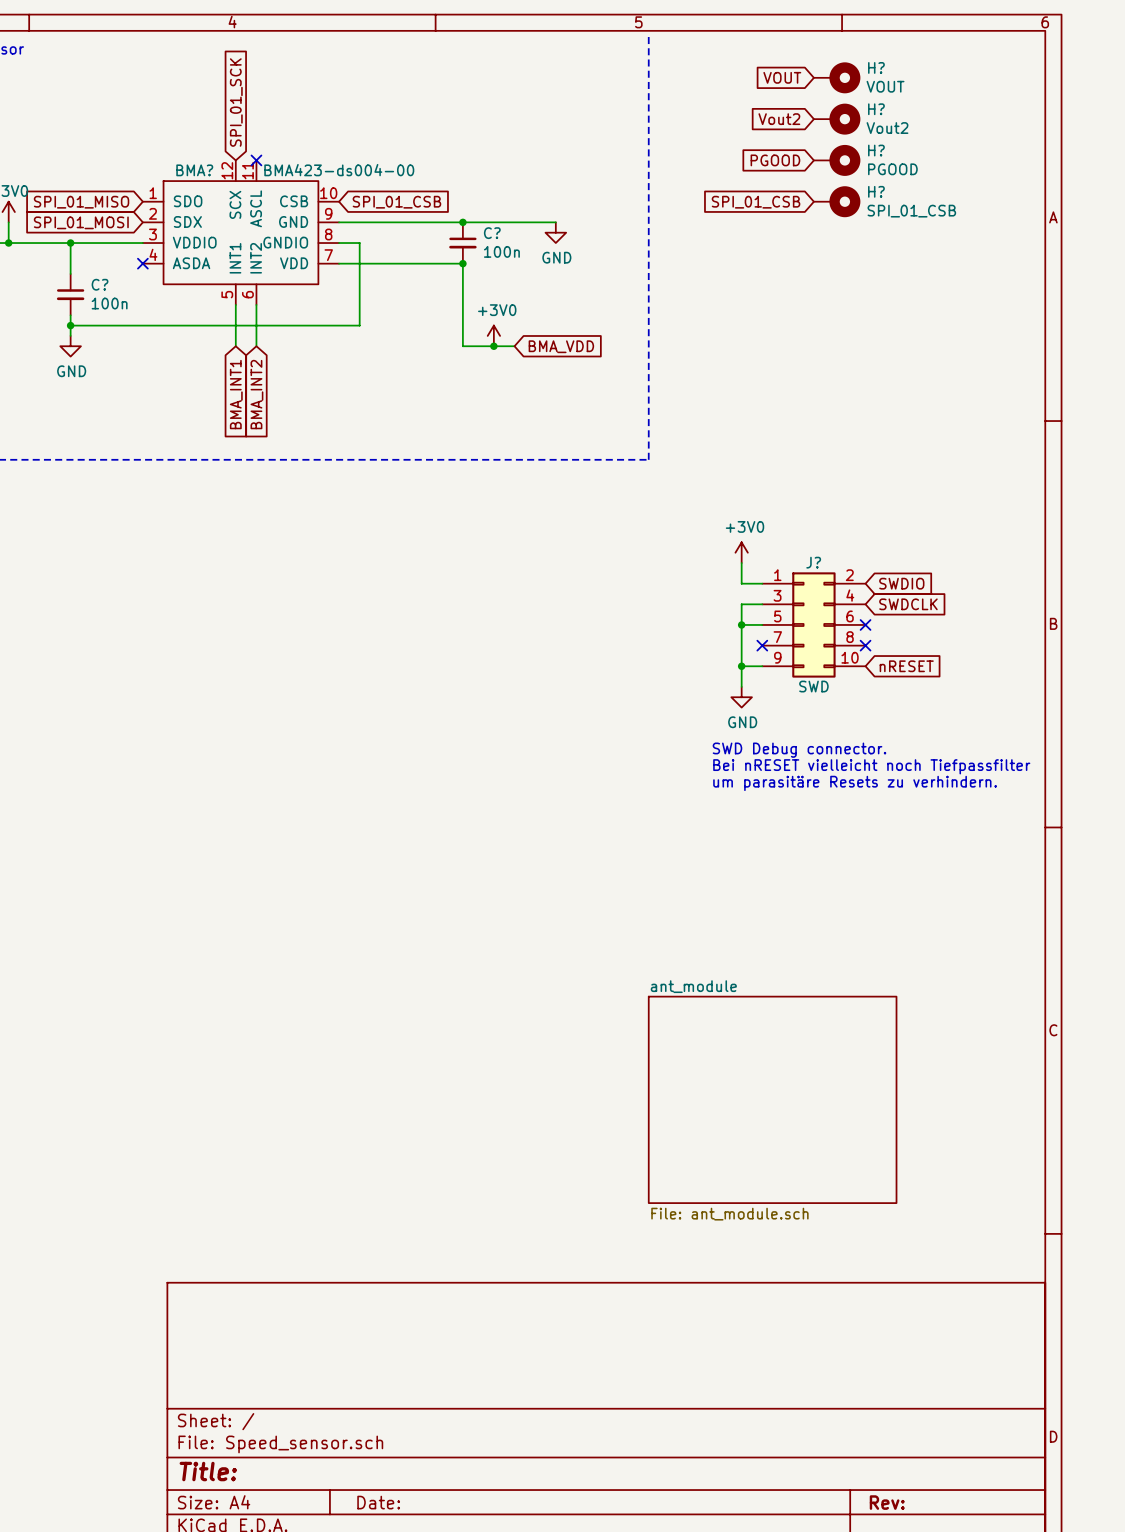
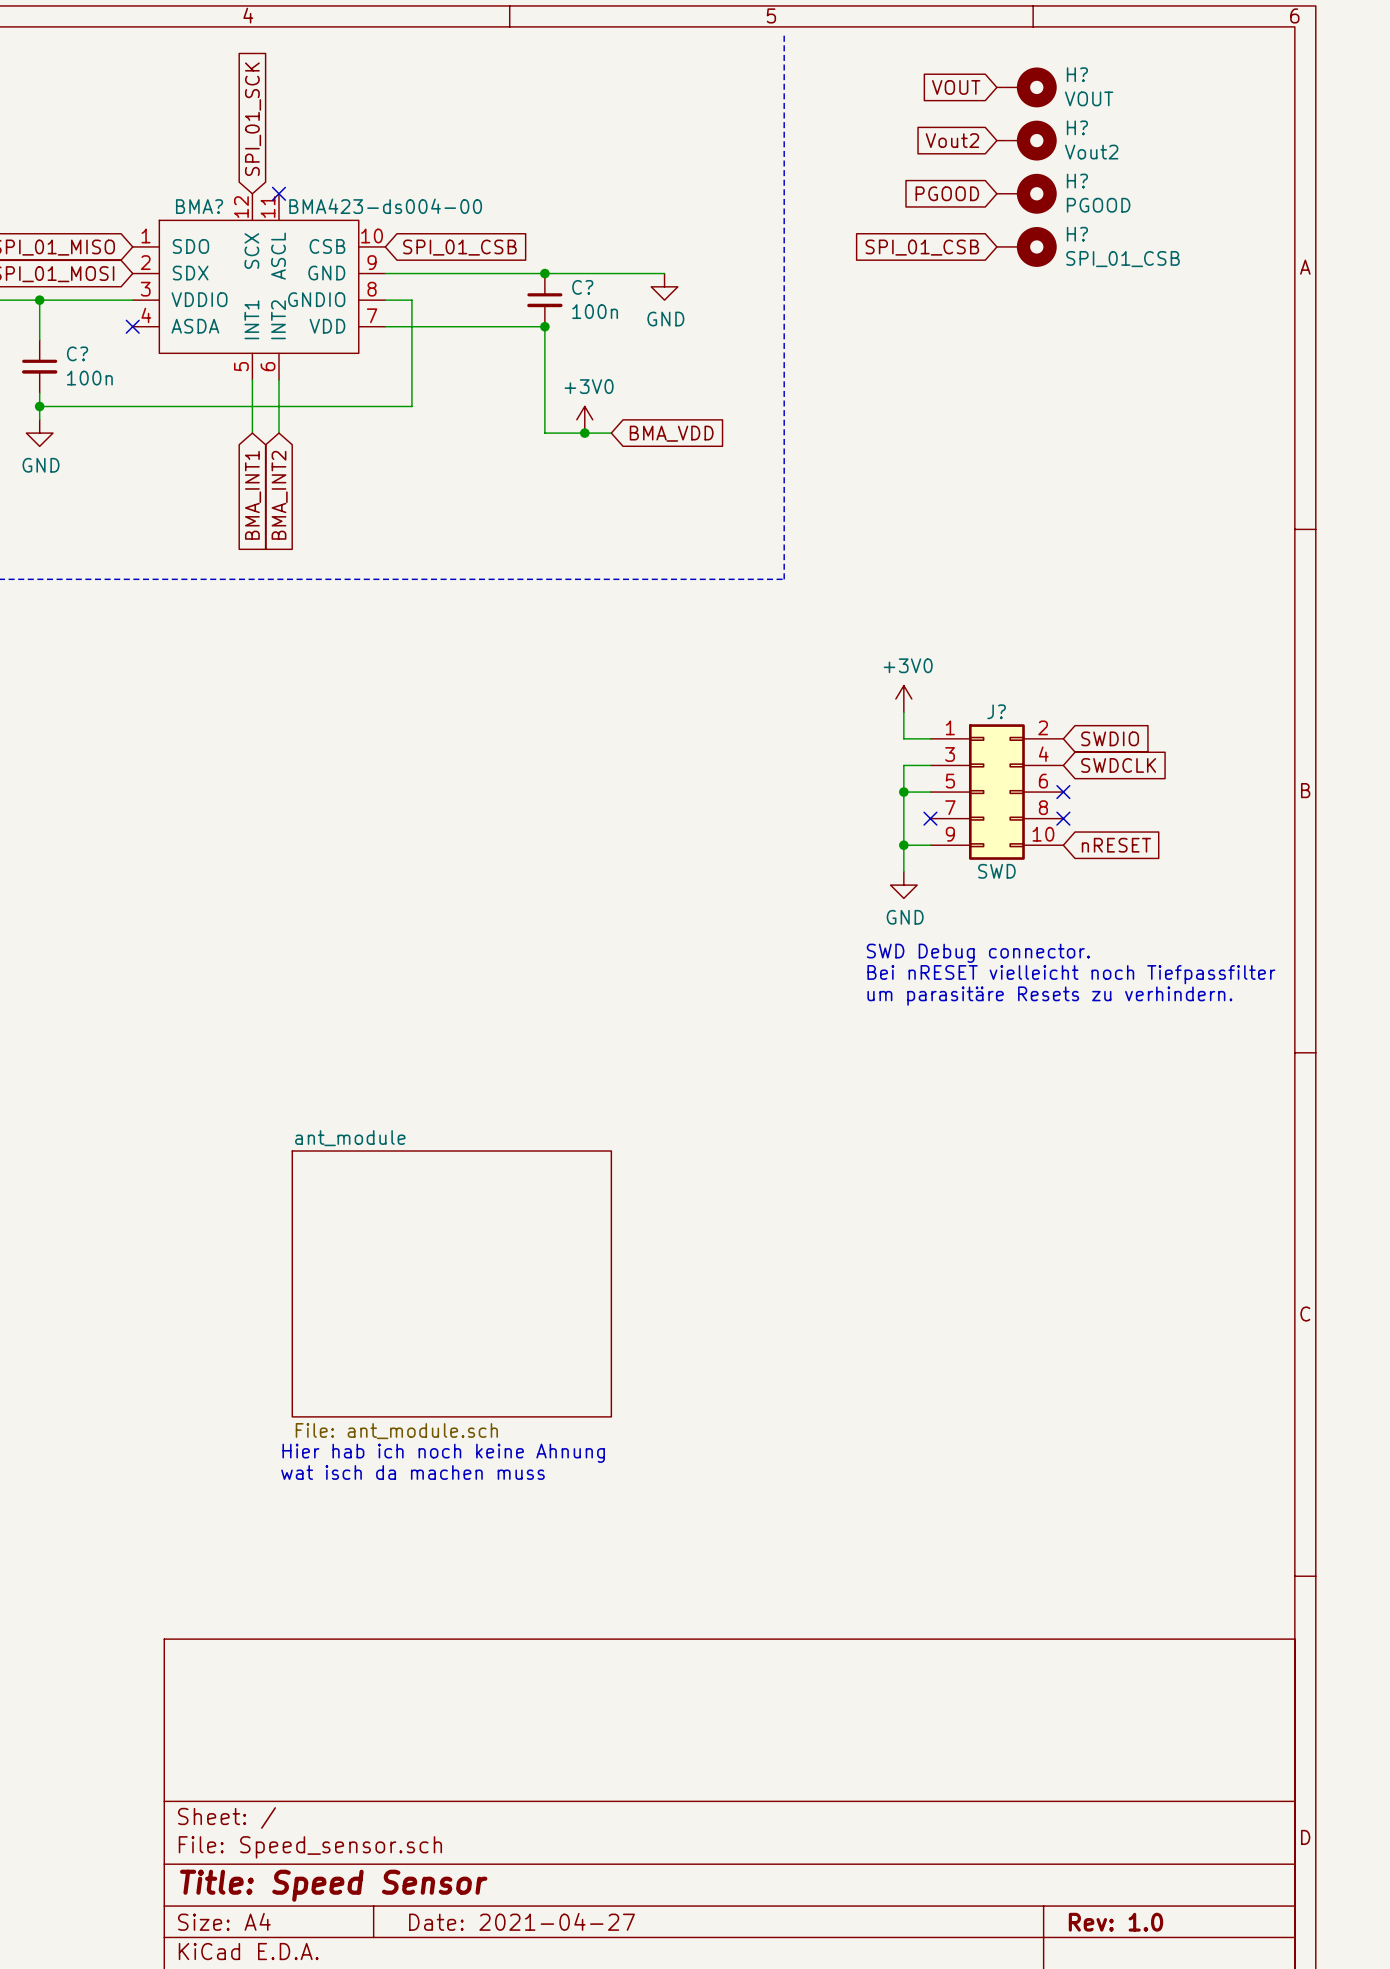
sheet ant_module: none -> File: ant_module.sch (451, 1283)
sheet ant_module: File: ant_module.sch (772, 1099) -> none
text: none -> Hier hab ich noch keine Ahnung (443, 1453)
text: none -> wat isch da machen muss (412, 1472)
title block: Title: (208, 1471) -> Title: Speed Sensor (333, 1885)
title block: Date: (378, 1502) -> Date: 2021-04-27 (522, 1921)
title block: Rev: (887, 1502) -> Rev: 1.0 (1115, 1922)

